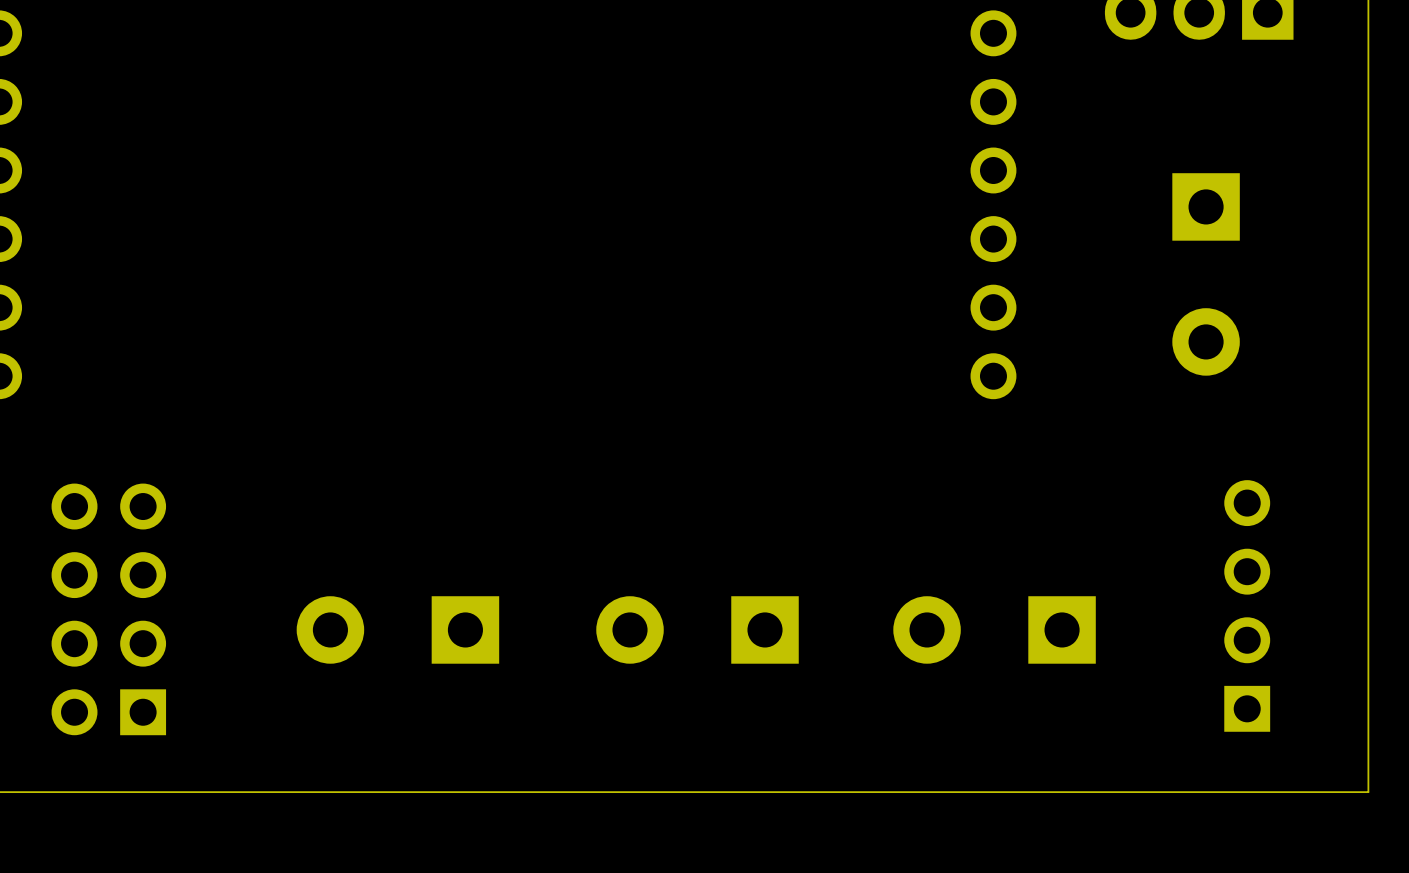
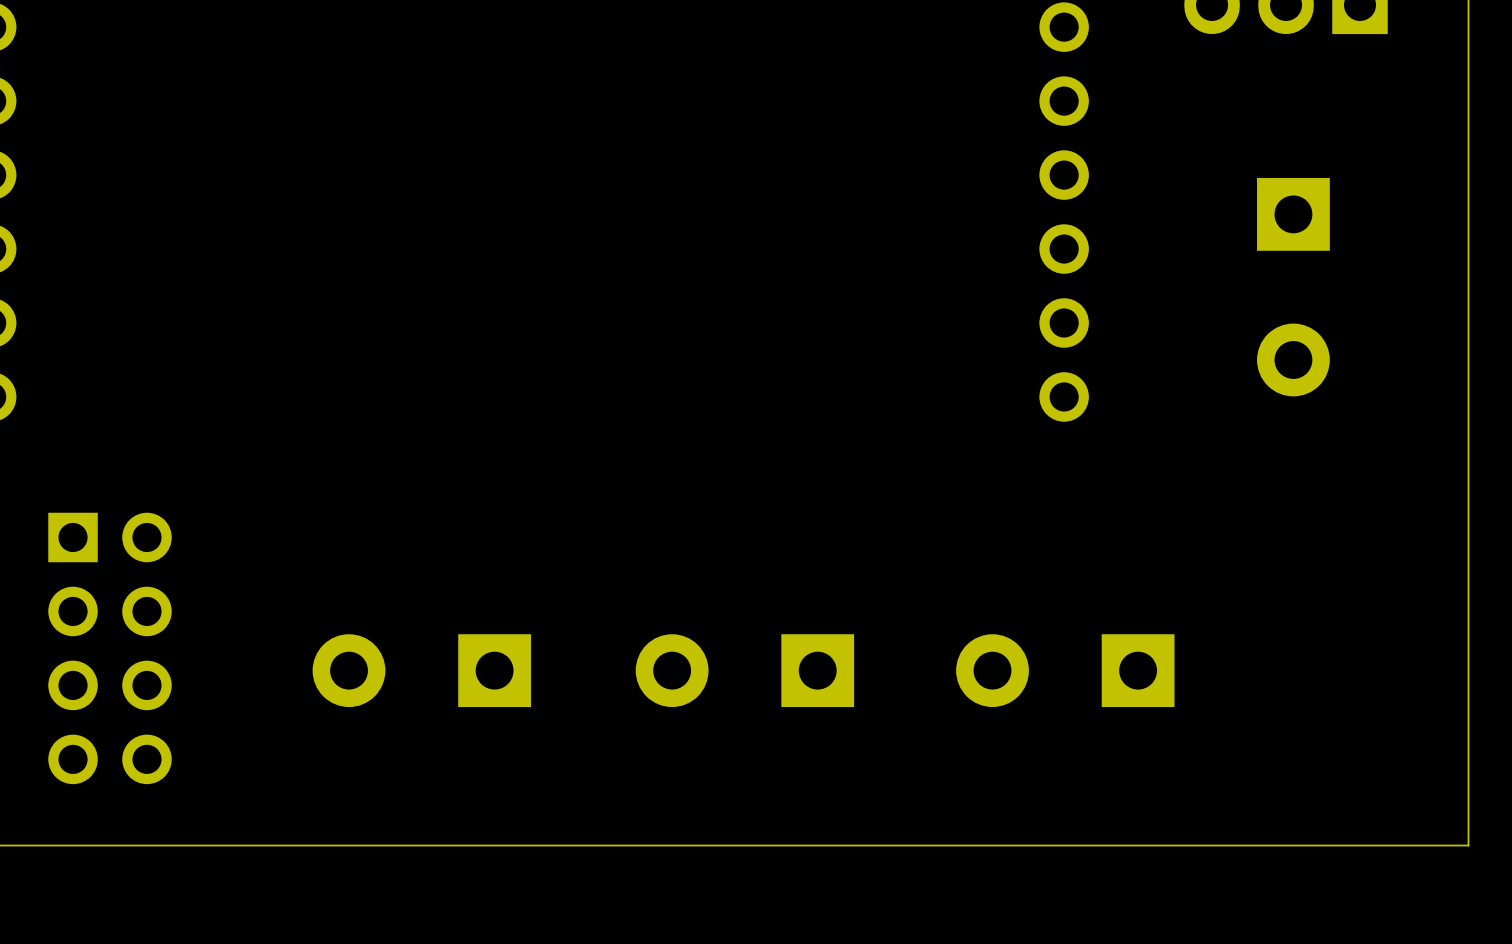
part: (1247, 605) -> none
part rotation: 0° (108, 609) -> 180° (110, 648)

